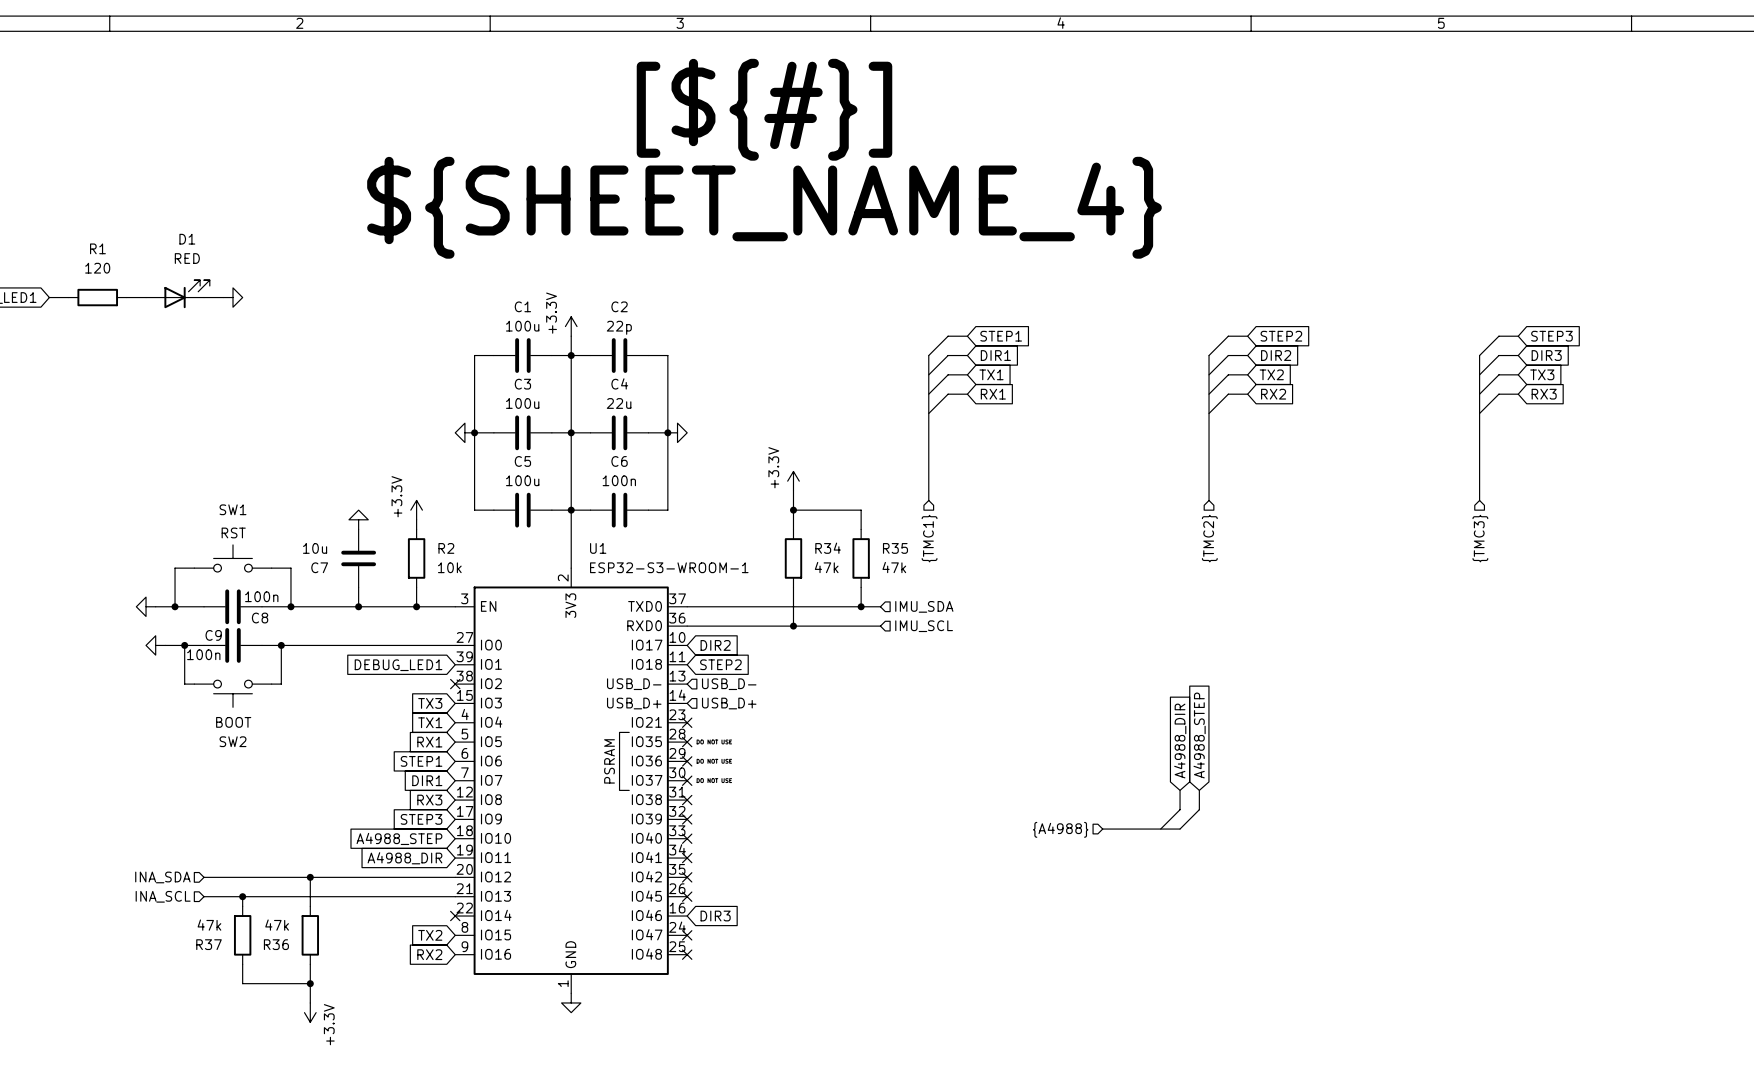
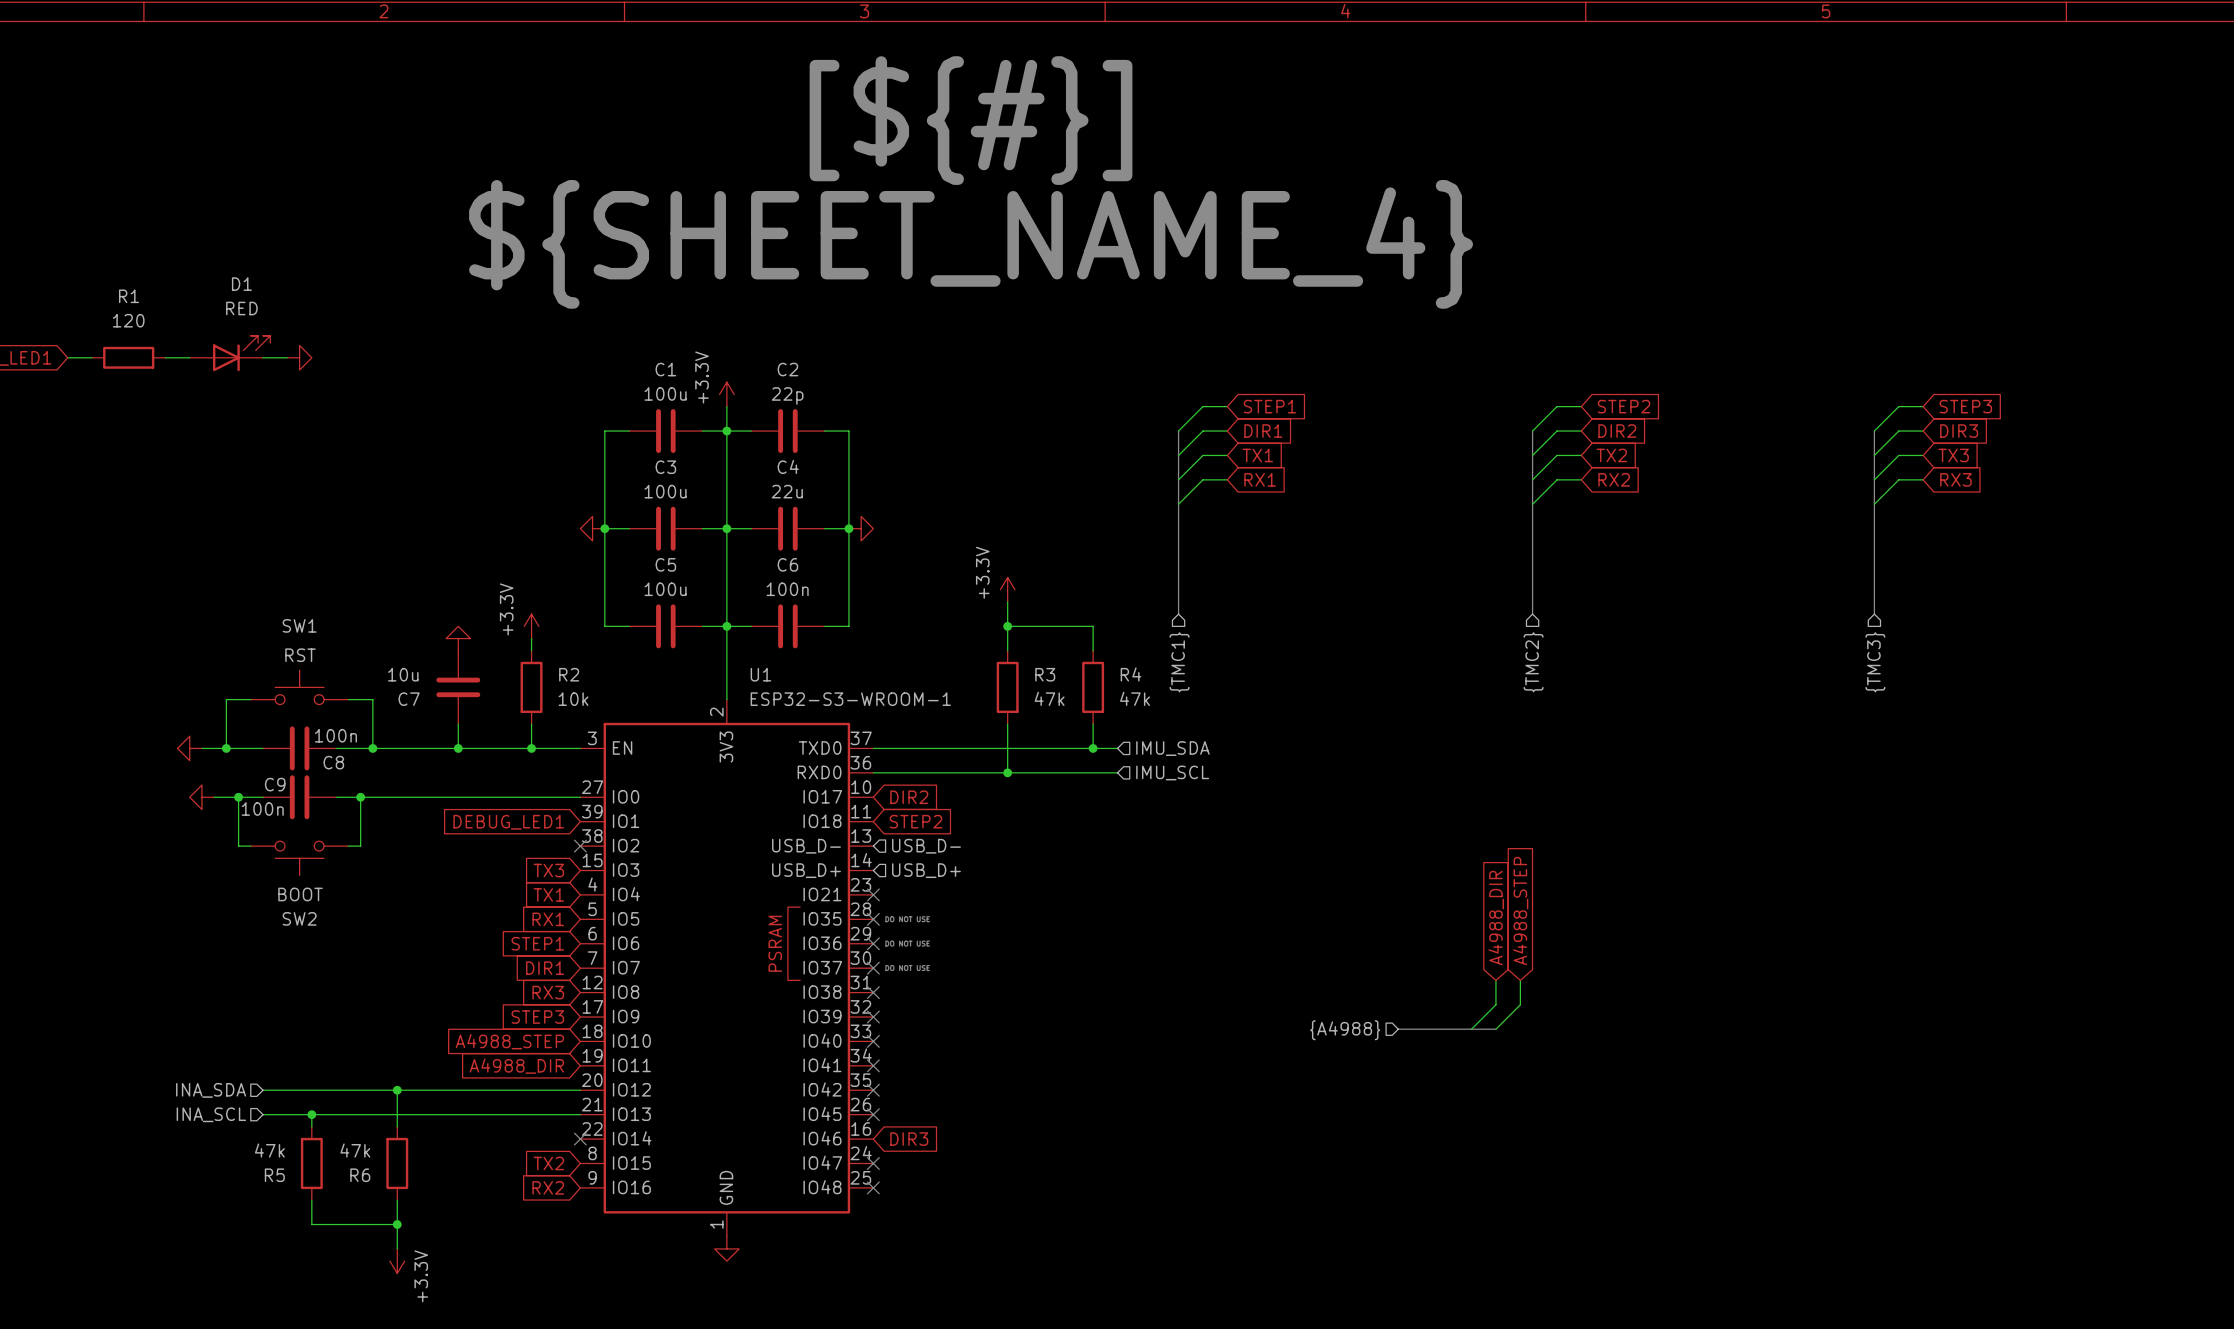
R34 name: R34 (828, 548) -> R3 (1045, 674)
R35 name: R35 (895, 548) -> R4 (1130, 674)
R37 name: R37 (209, 944) -> R5 (274, 1175)
R36 name: R36 (276, 944) -> R6 (360, 1175)

